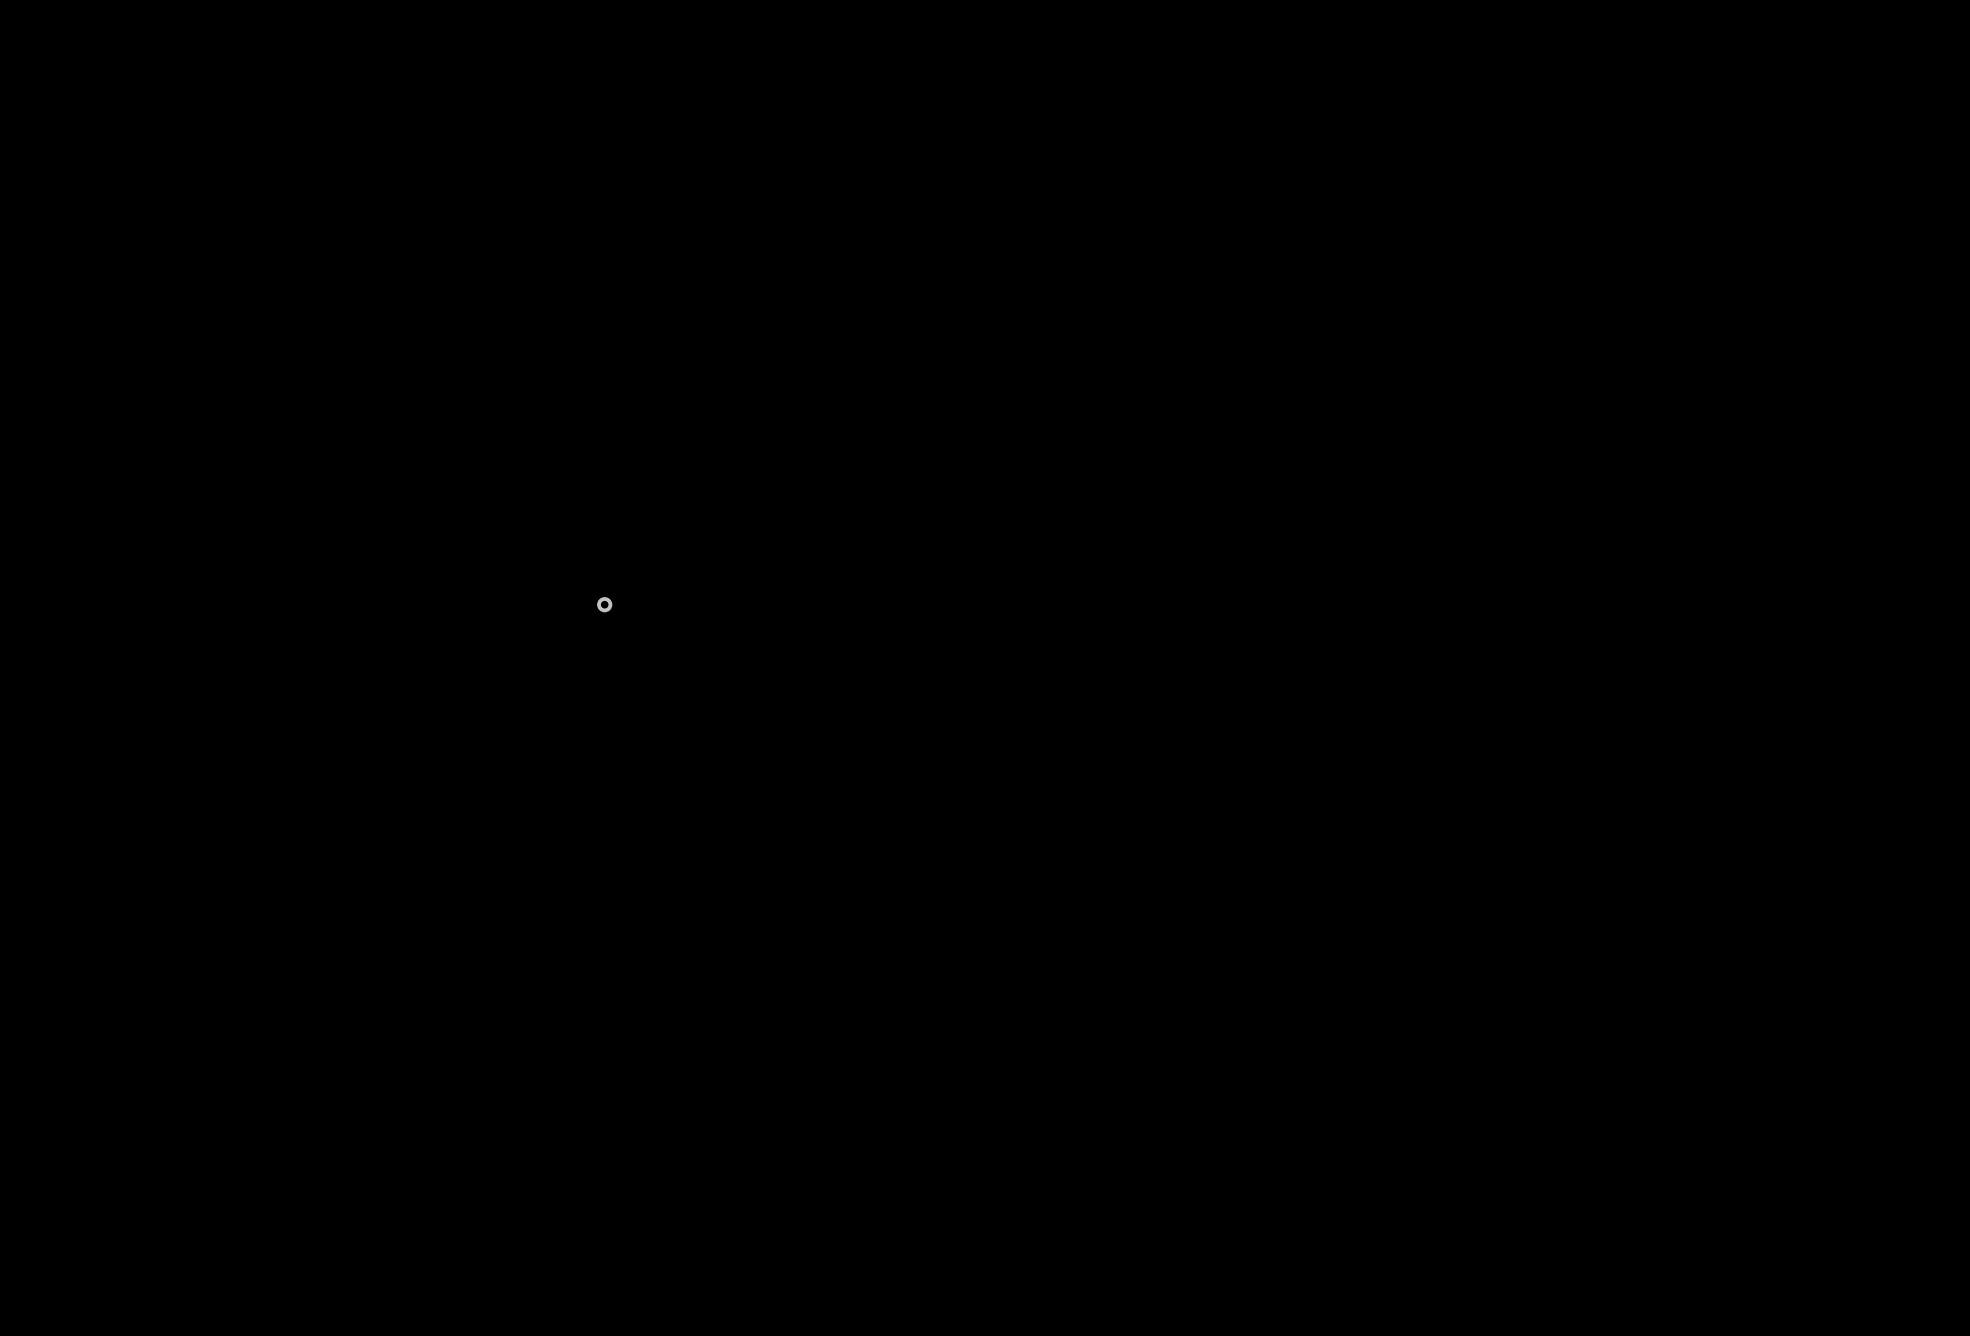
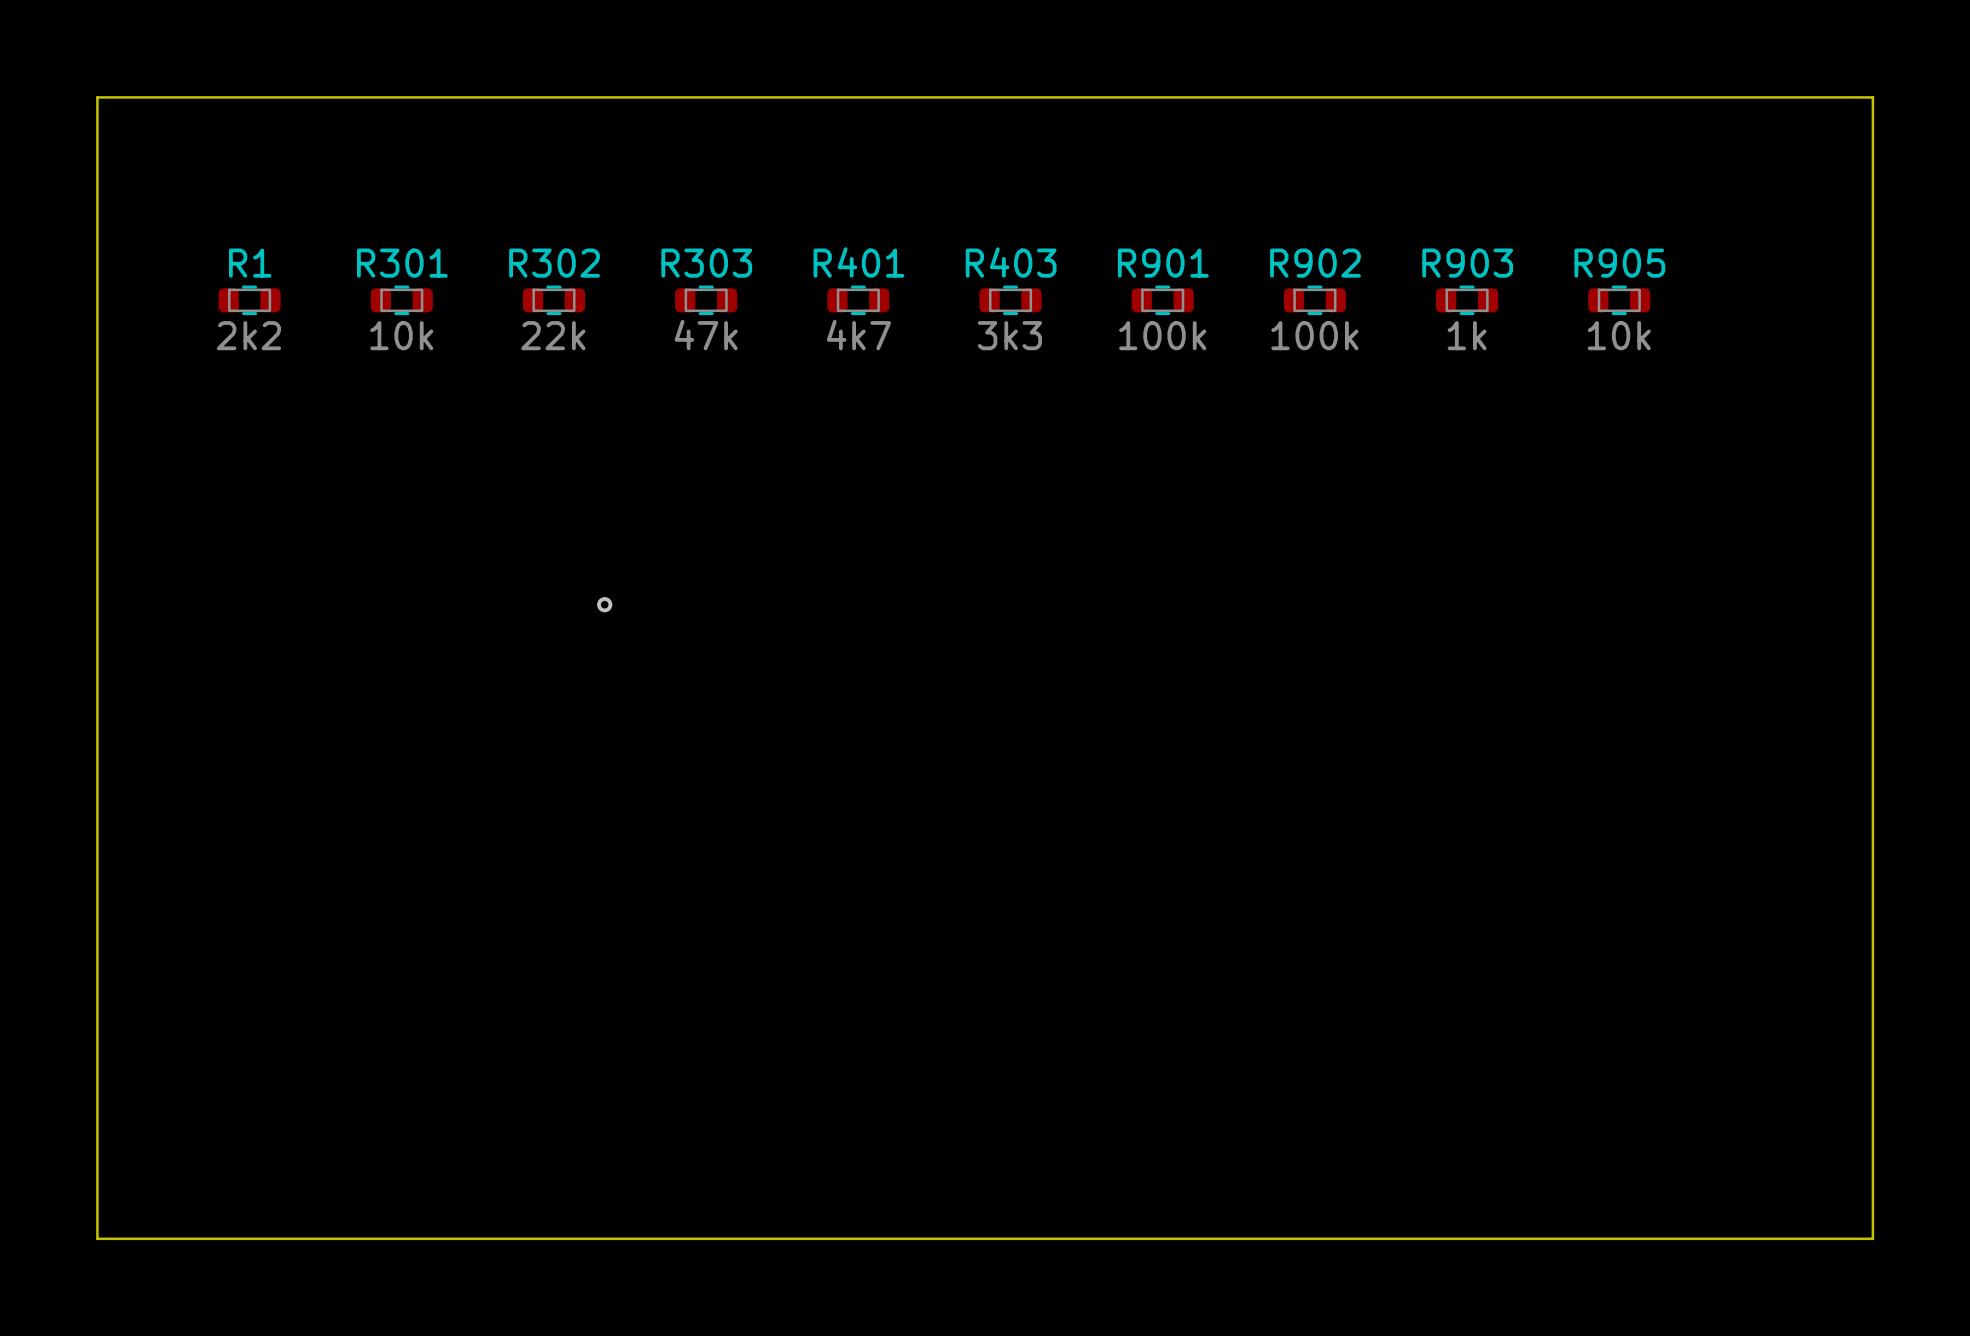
board edge: none -> (97, 97) (1872, 97) (1872, 1238) (97, 1238) (97, 97)
R1: none -> 2k2 (249, 300)
R301: none -> 10k (401, 300)
R302: none -> 22k (553, 300)
R303: none -> 47k (706, 300)
R401: none -> 4k7 (858, 300)
R403: none -> 3k3 (1010, 300)
R901: none -> 100k (1162, 300)
R902: none -> 100k (1314, 300)
R903: none -> 1k (1467, 300)
R905: none -> 10k (1619, 300)

